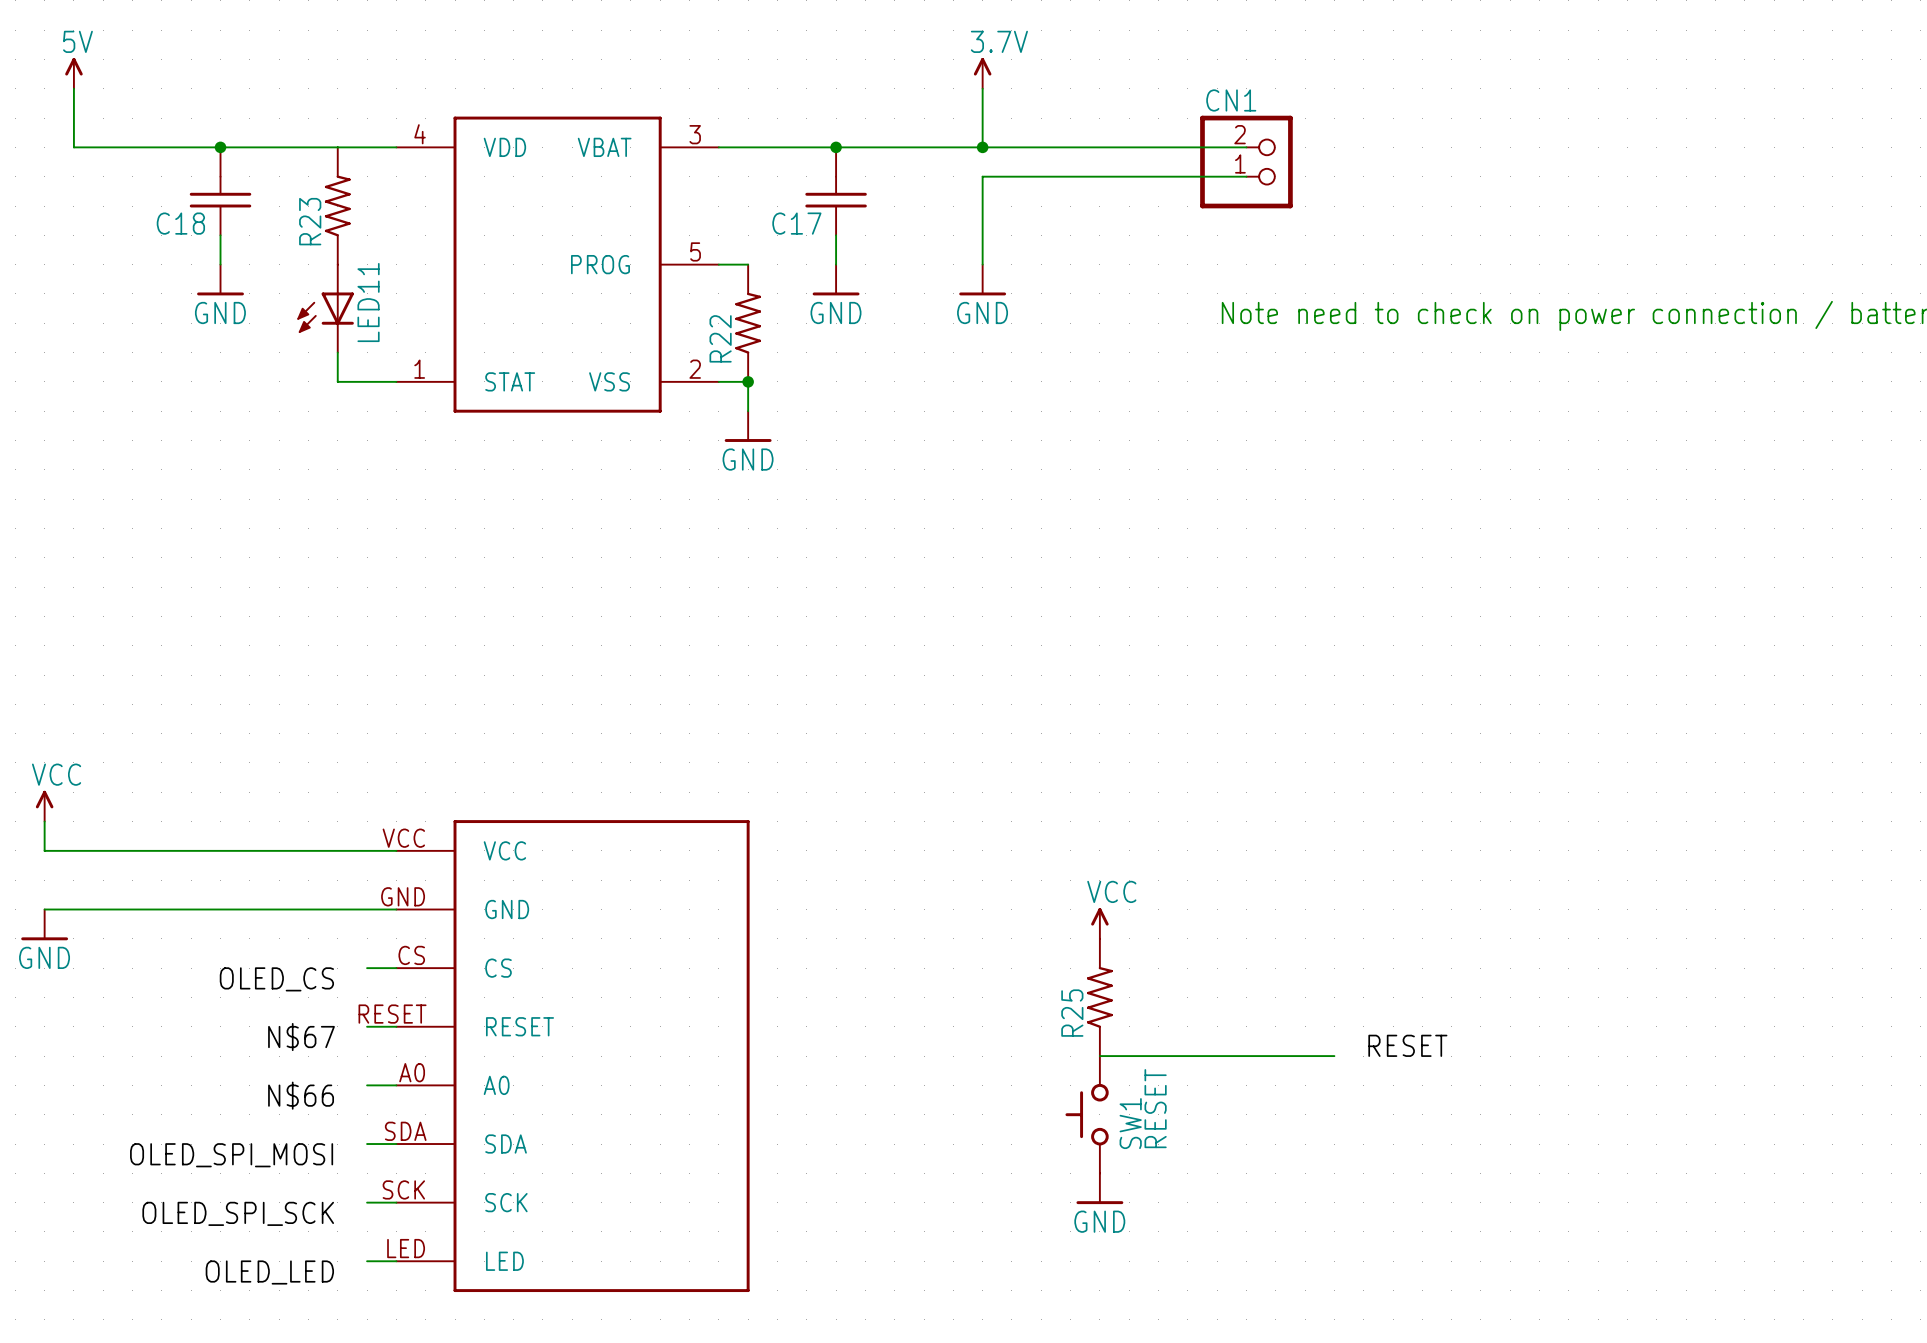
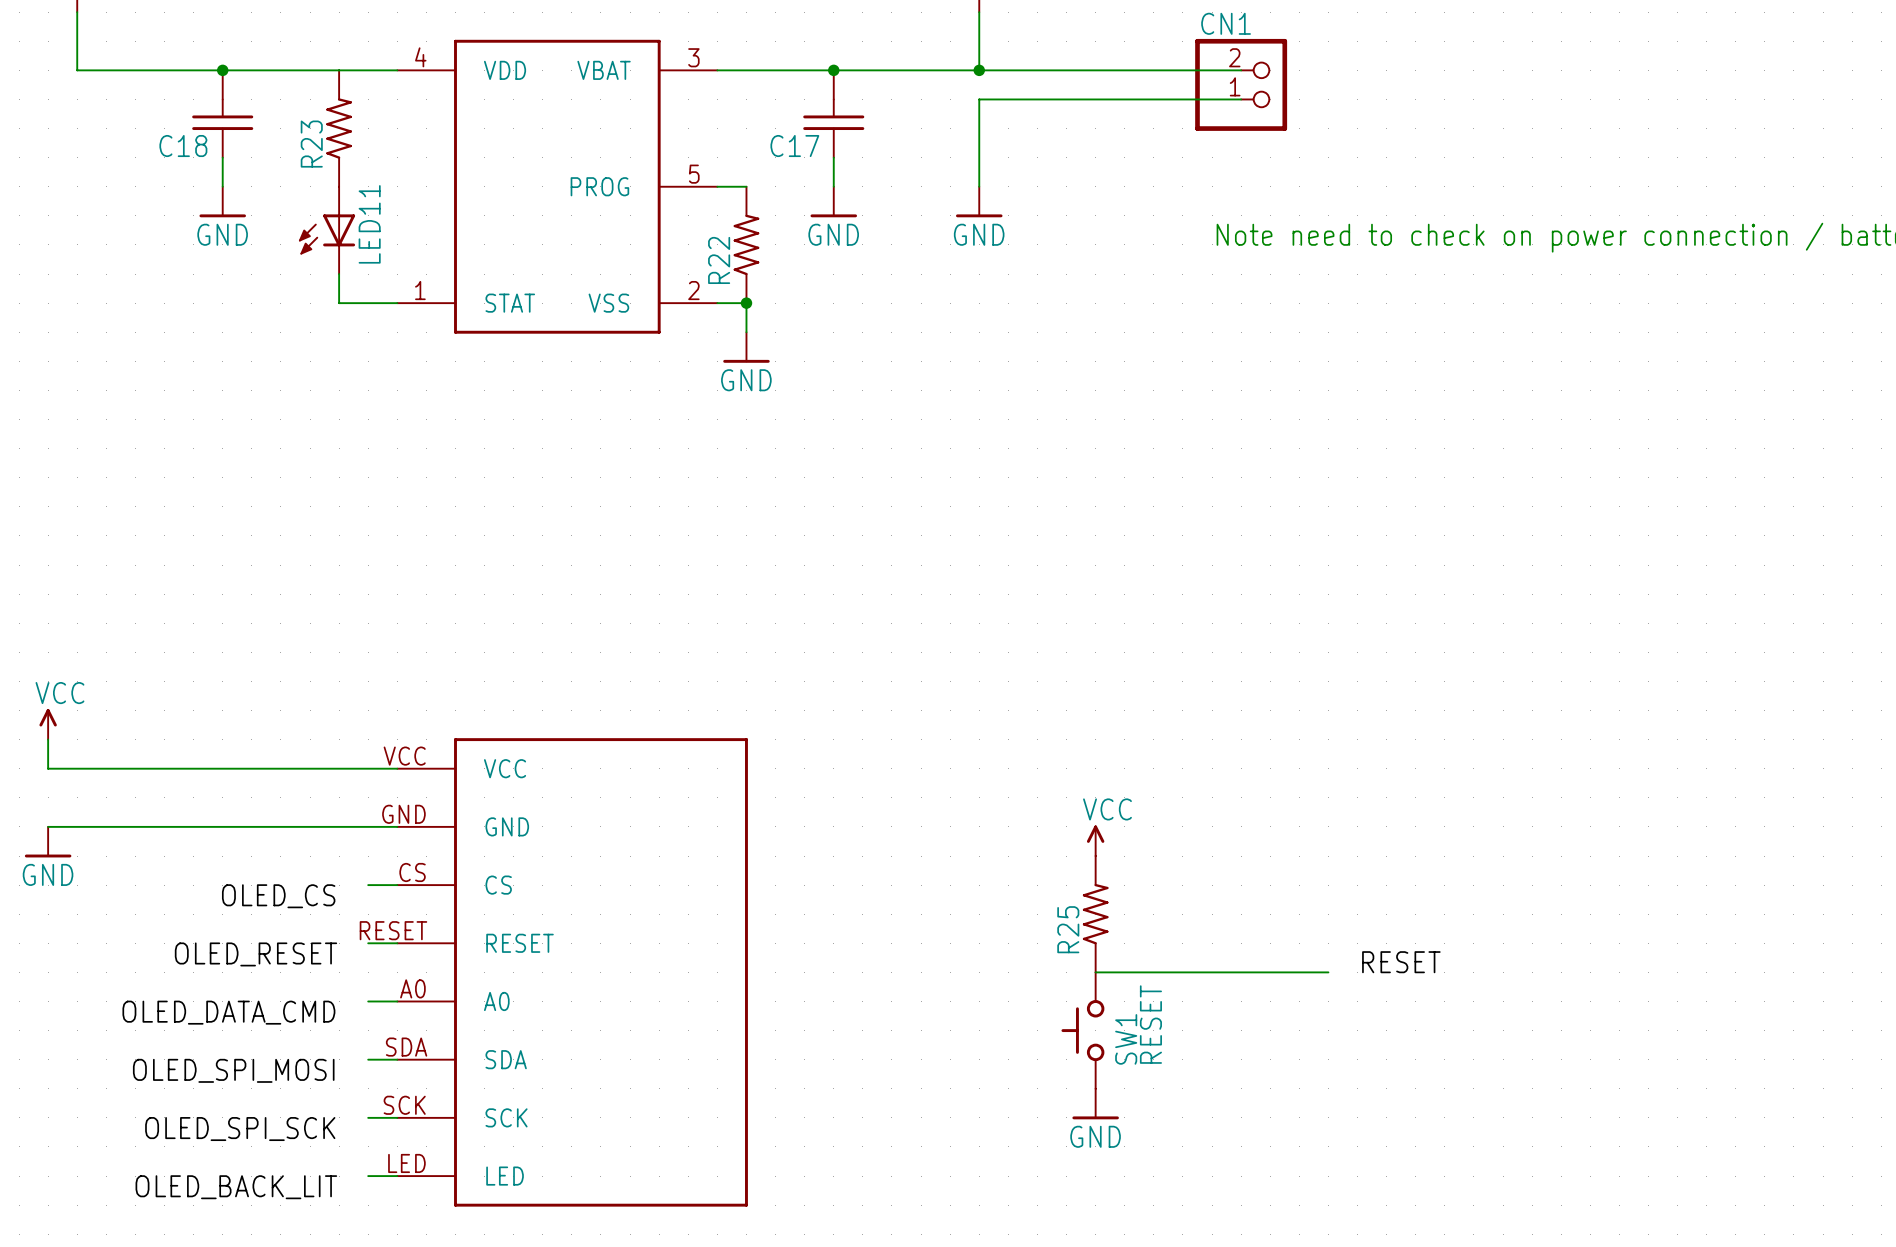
label: N$67 (301, 1037) -> OLED_RESET (255, 954)
label: N$66 (301, 1095) -> OLED_DATA_CMD (228, 1012)
label: OLED_LED (269, 1272) -> OLED_BACK_LIT (236, 1187)

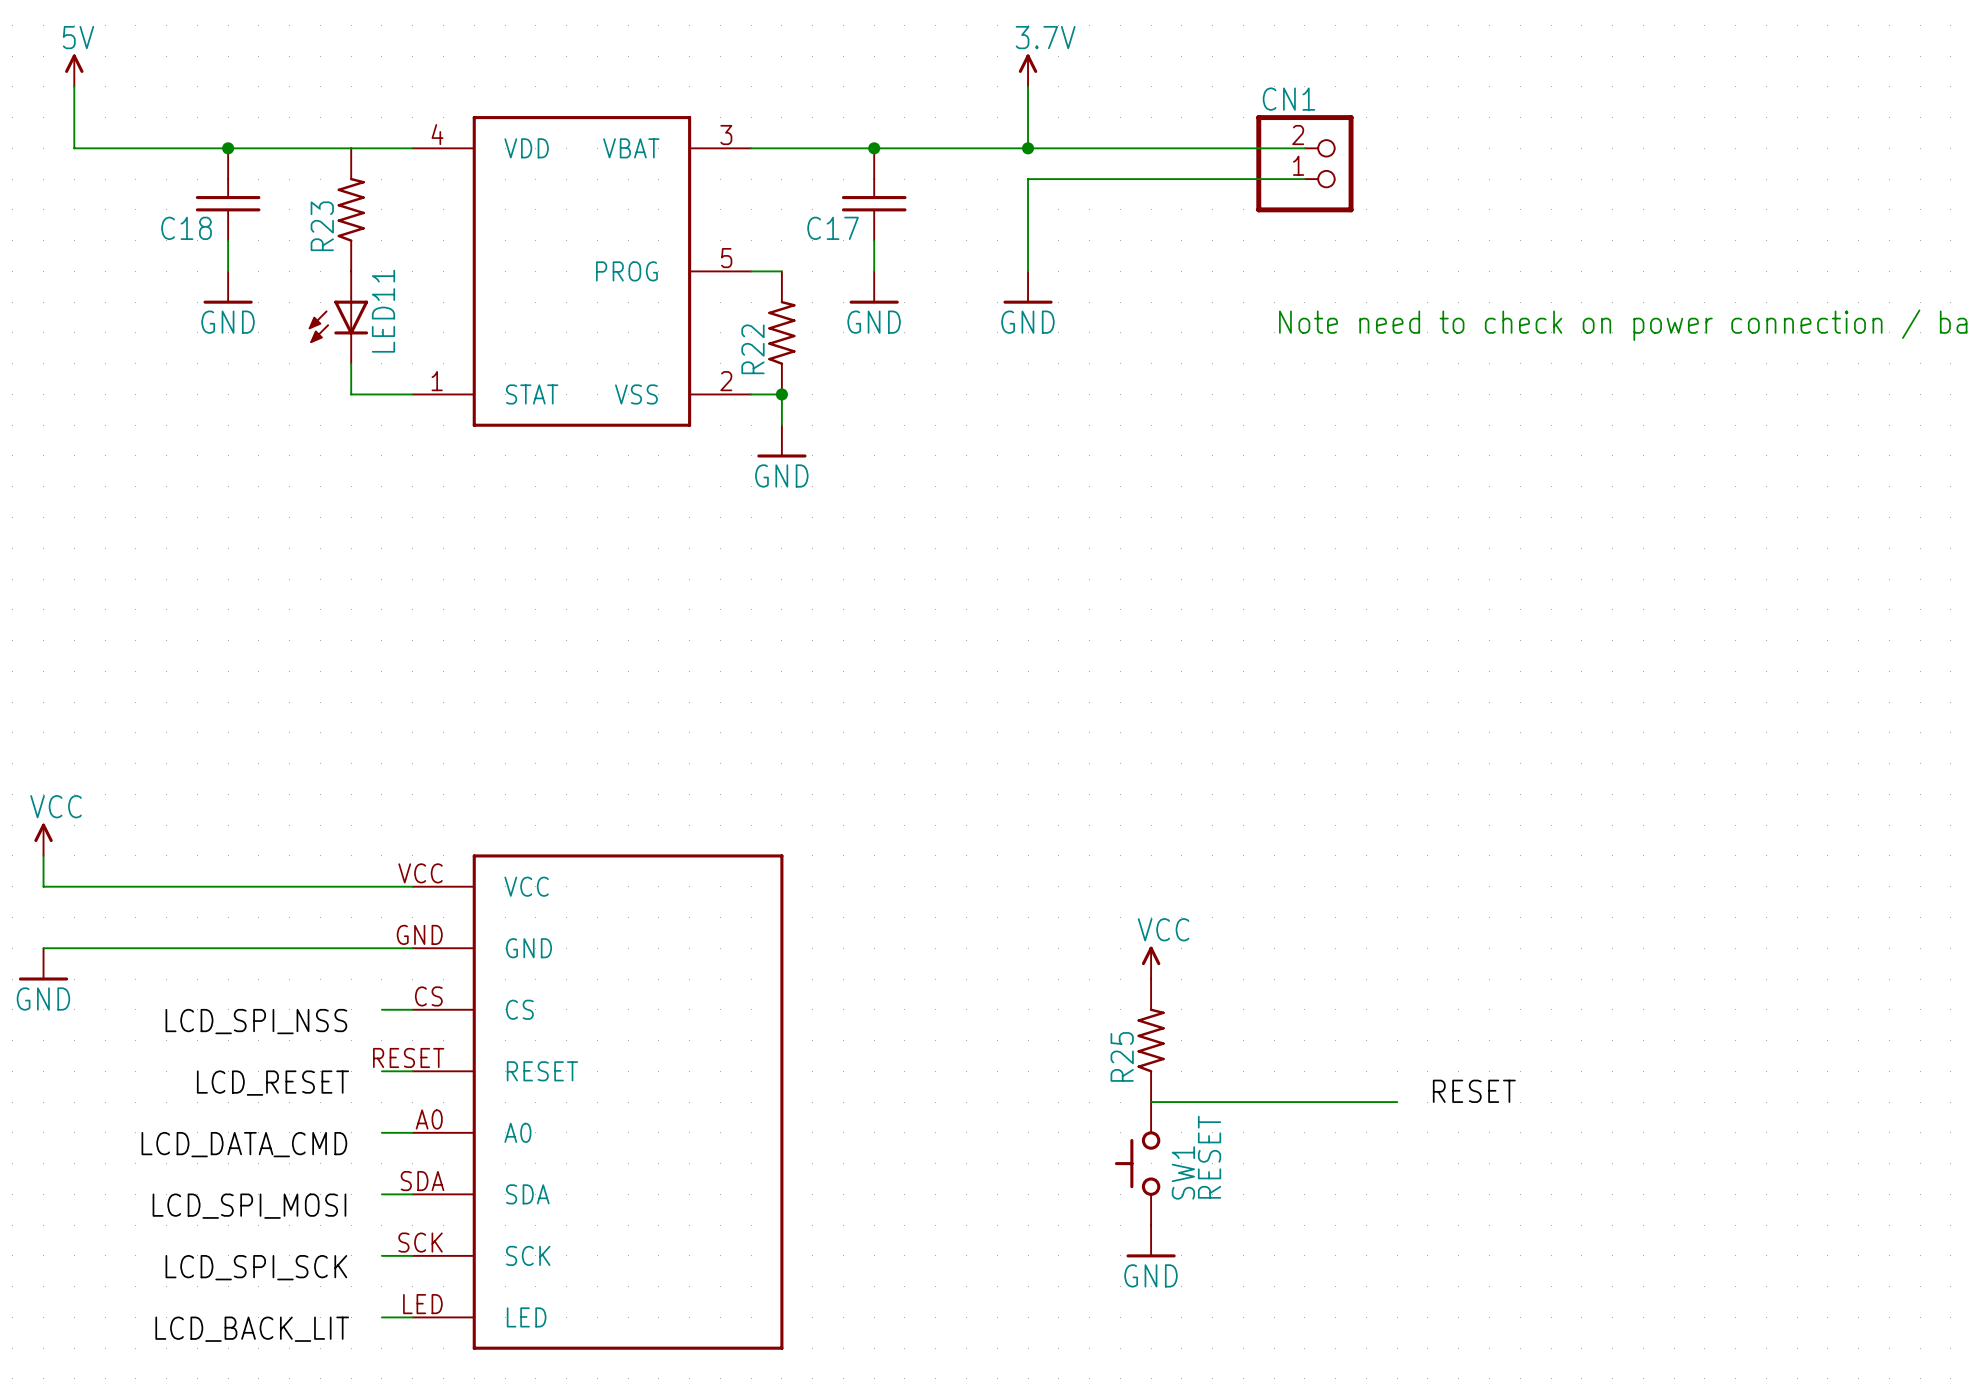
label: OLED_CS (278, 896) -> LCD_SPI_NSS (256, 1021)
label: OLED_RESET (255, 954) -> LCD_RESET (272, 1083)
label: OLED_DATA_CMD (228, 1012) -> LCD_DATA_CMD (244, 1144)
label: OLED_SPI_MOSI (233, 1070) -> LCD_SPI_MOSI (249, 1206)
label: OLED_SPI_SCK (240, 1129) -> LCD_SPI_SCK (256, 1267)
label: OLED_BACK_LIT (236, 1187) -> LCD_BACK_LIT (252, 1329)

